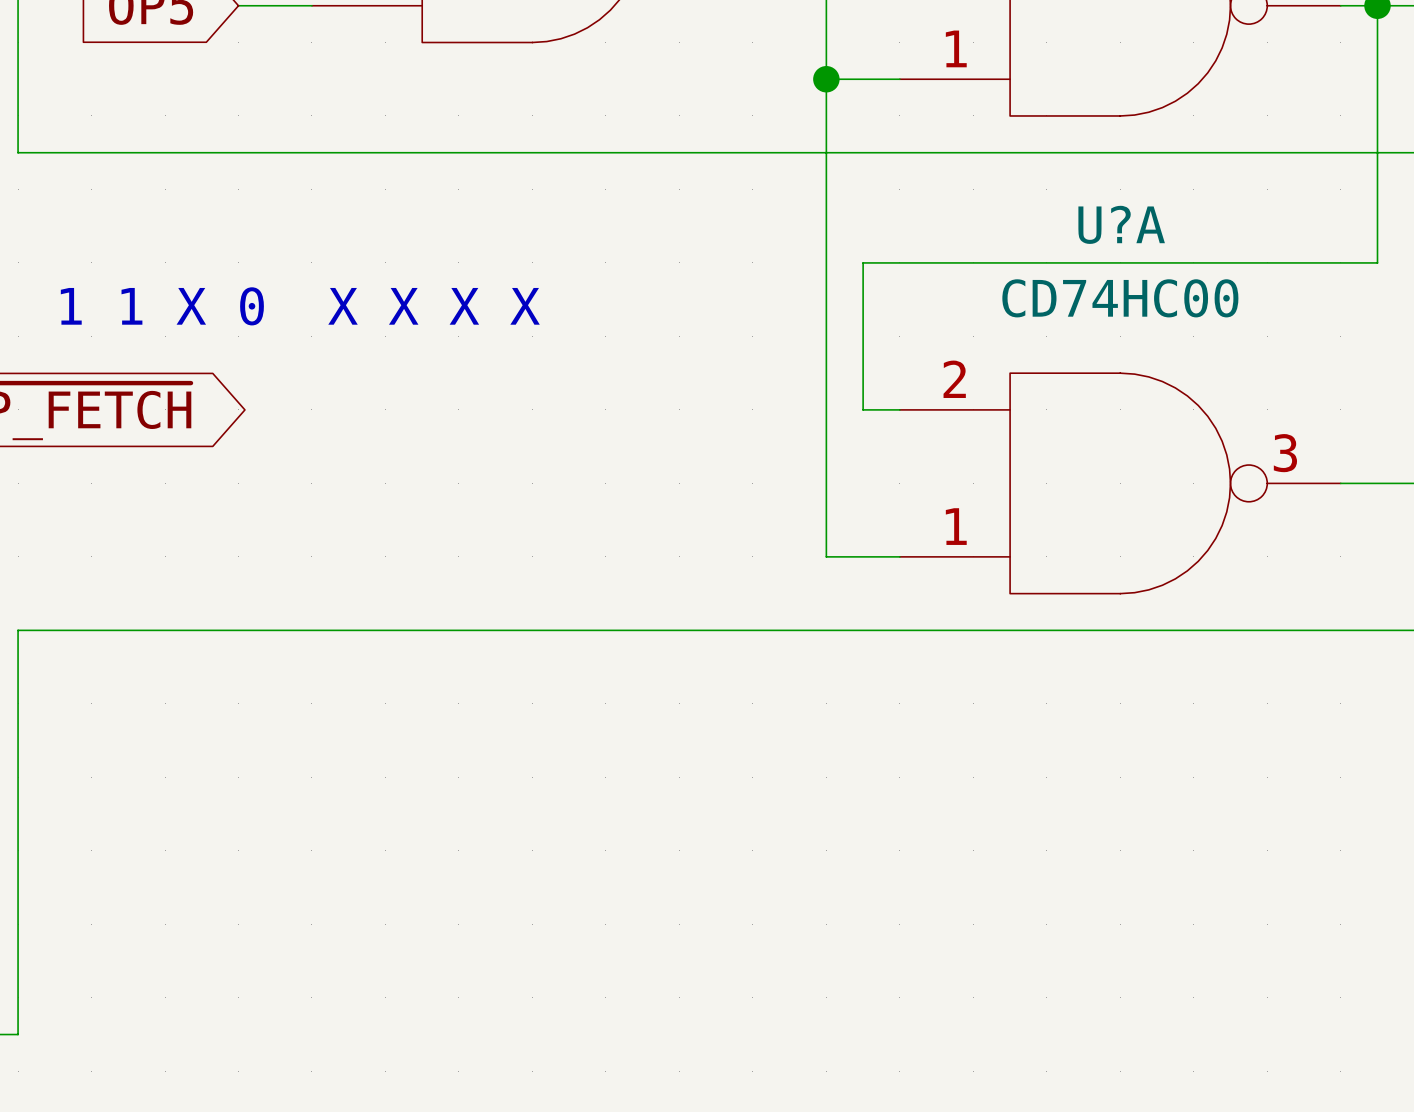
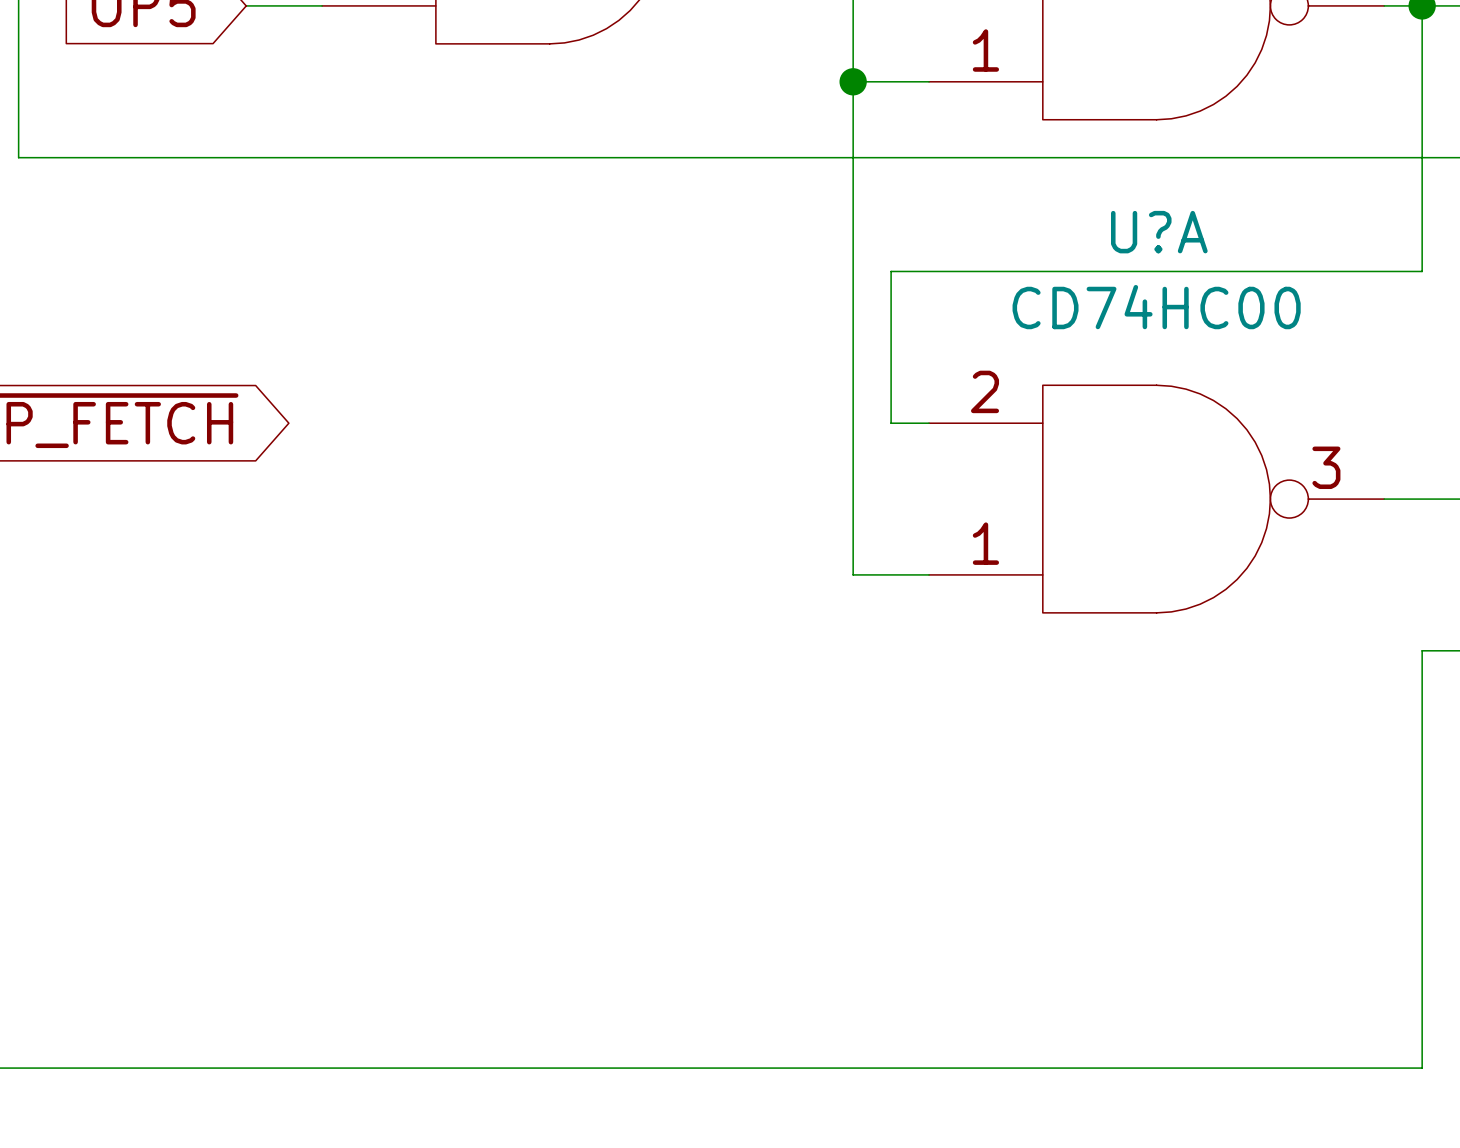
text: 1 1 X 0 X X X X (300, 306) -> none
wire: (1377, 630) (18, 630) (18, 1034) -> (1422, 650) (1422, 1068) (18, 1068)

